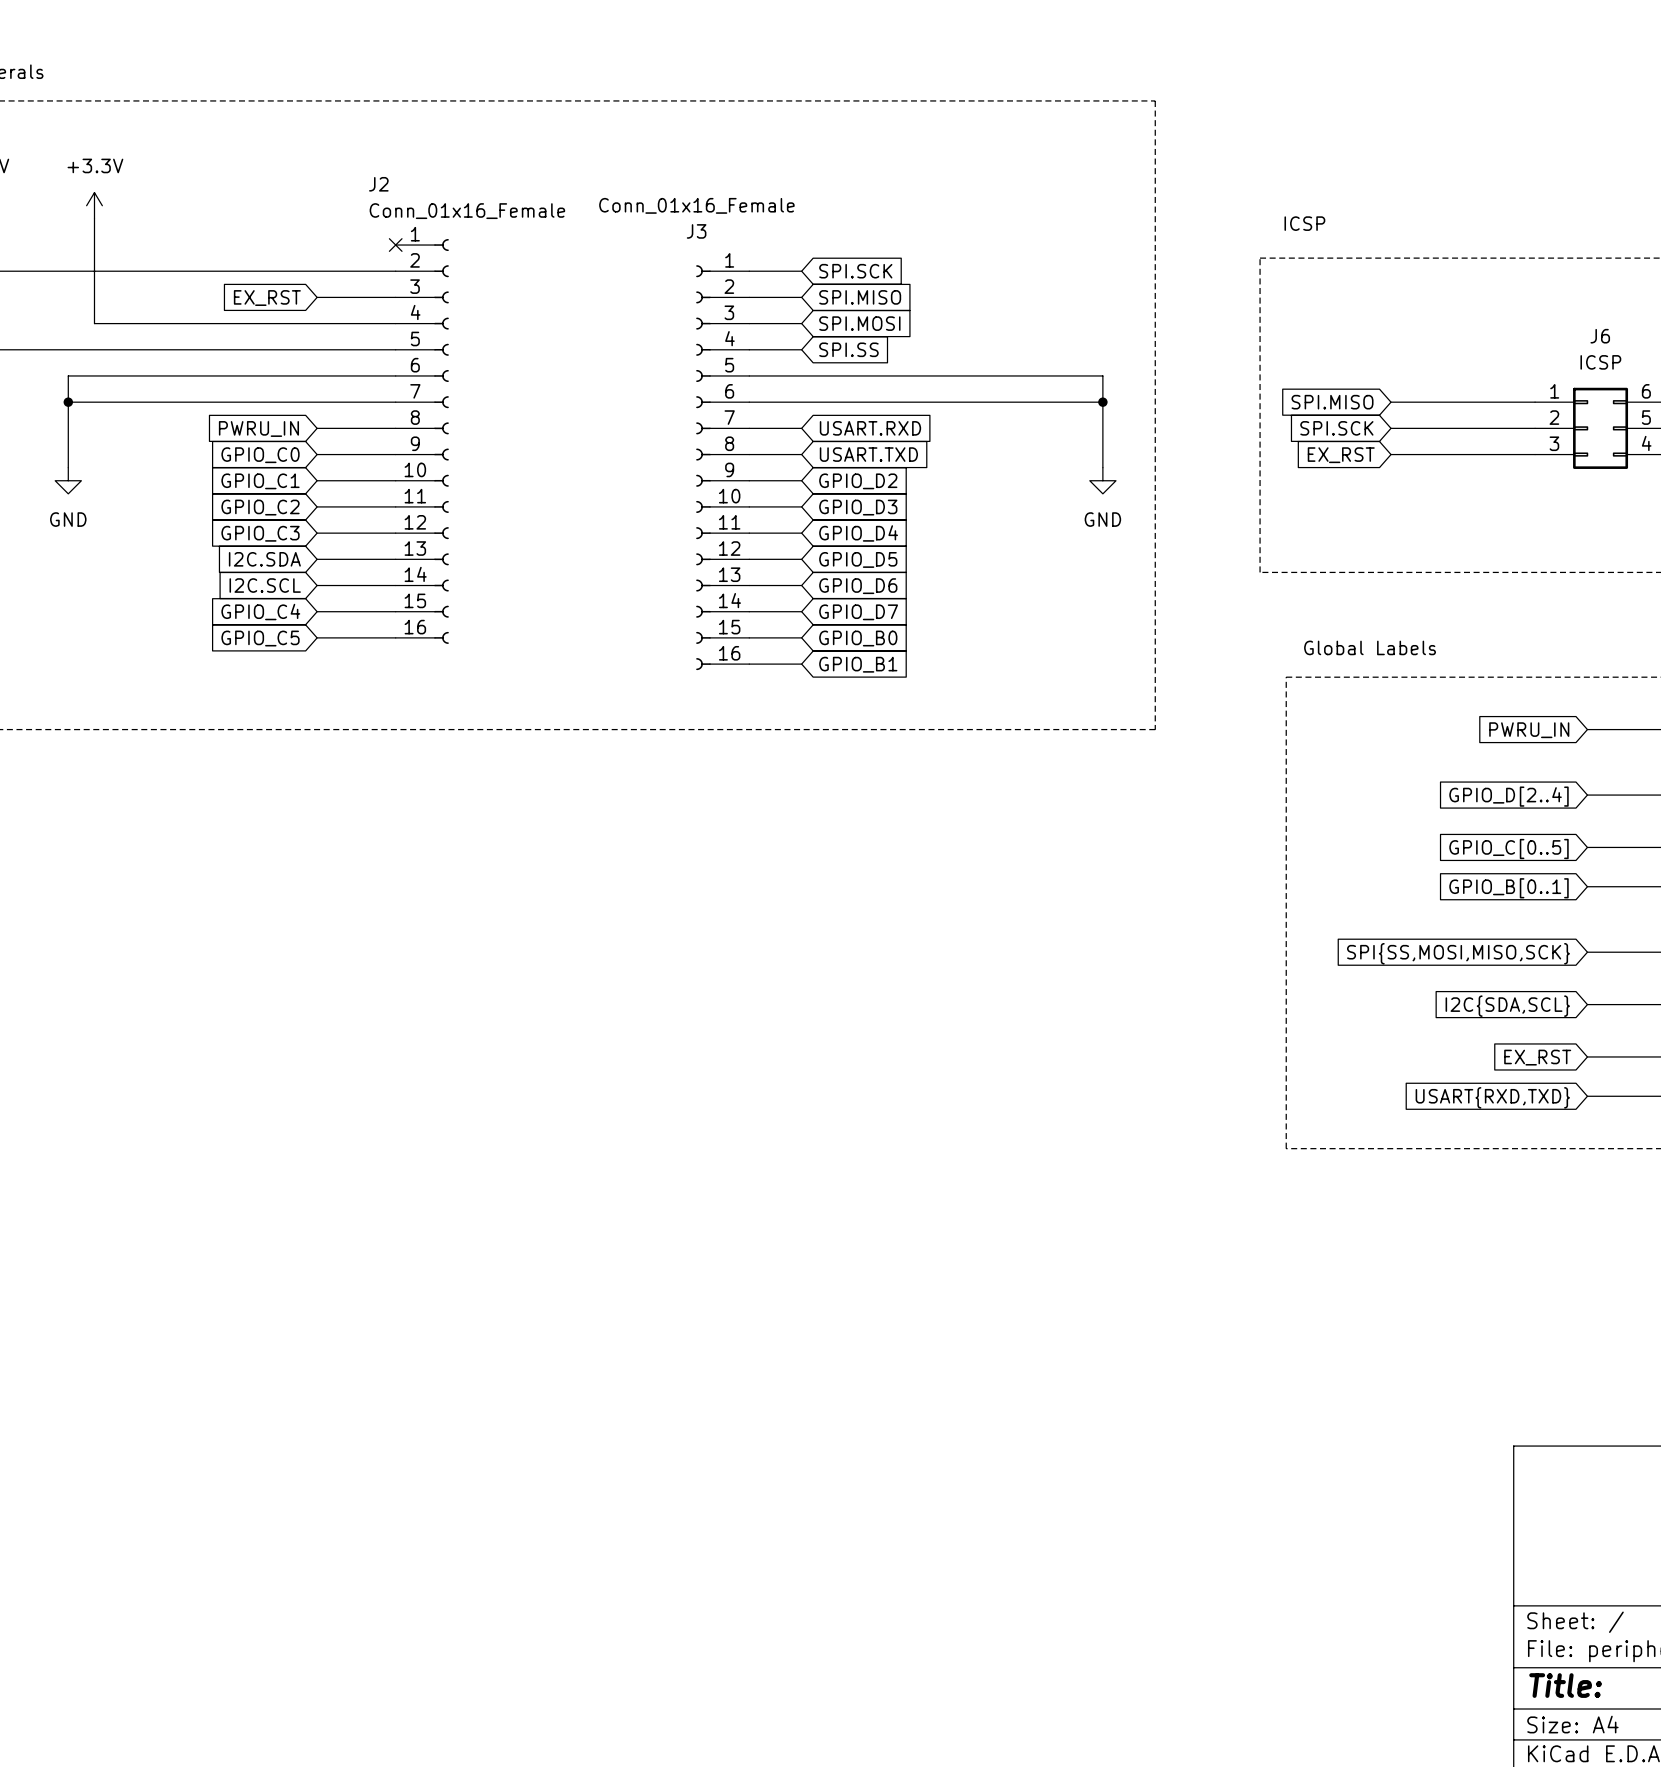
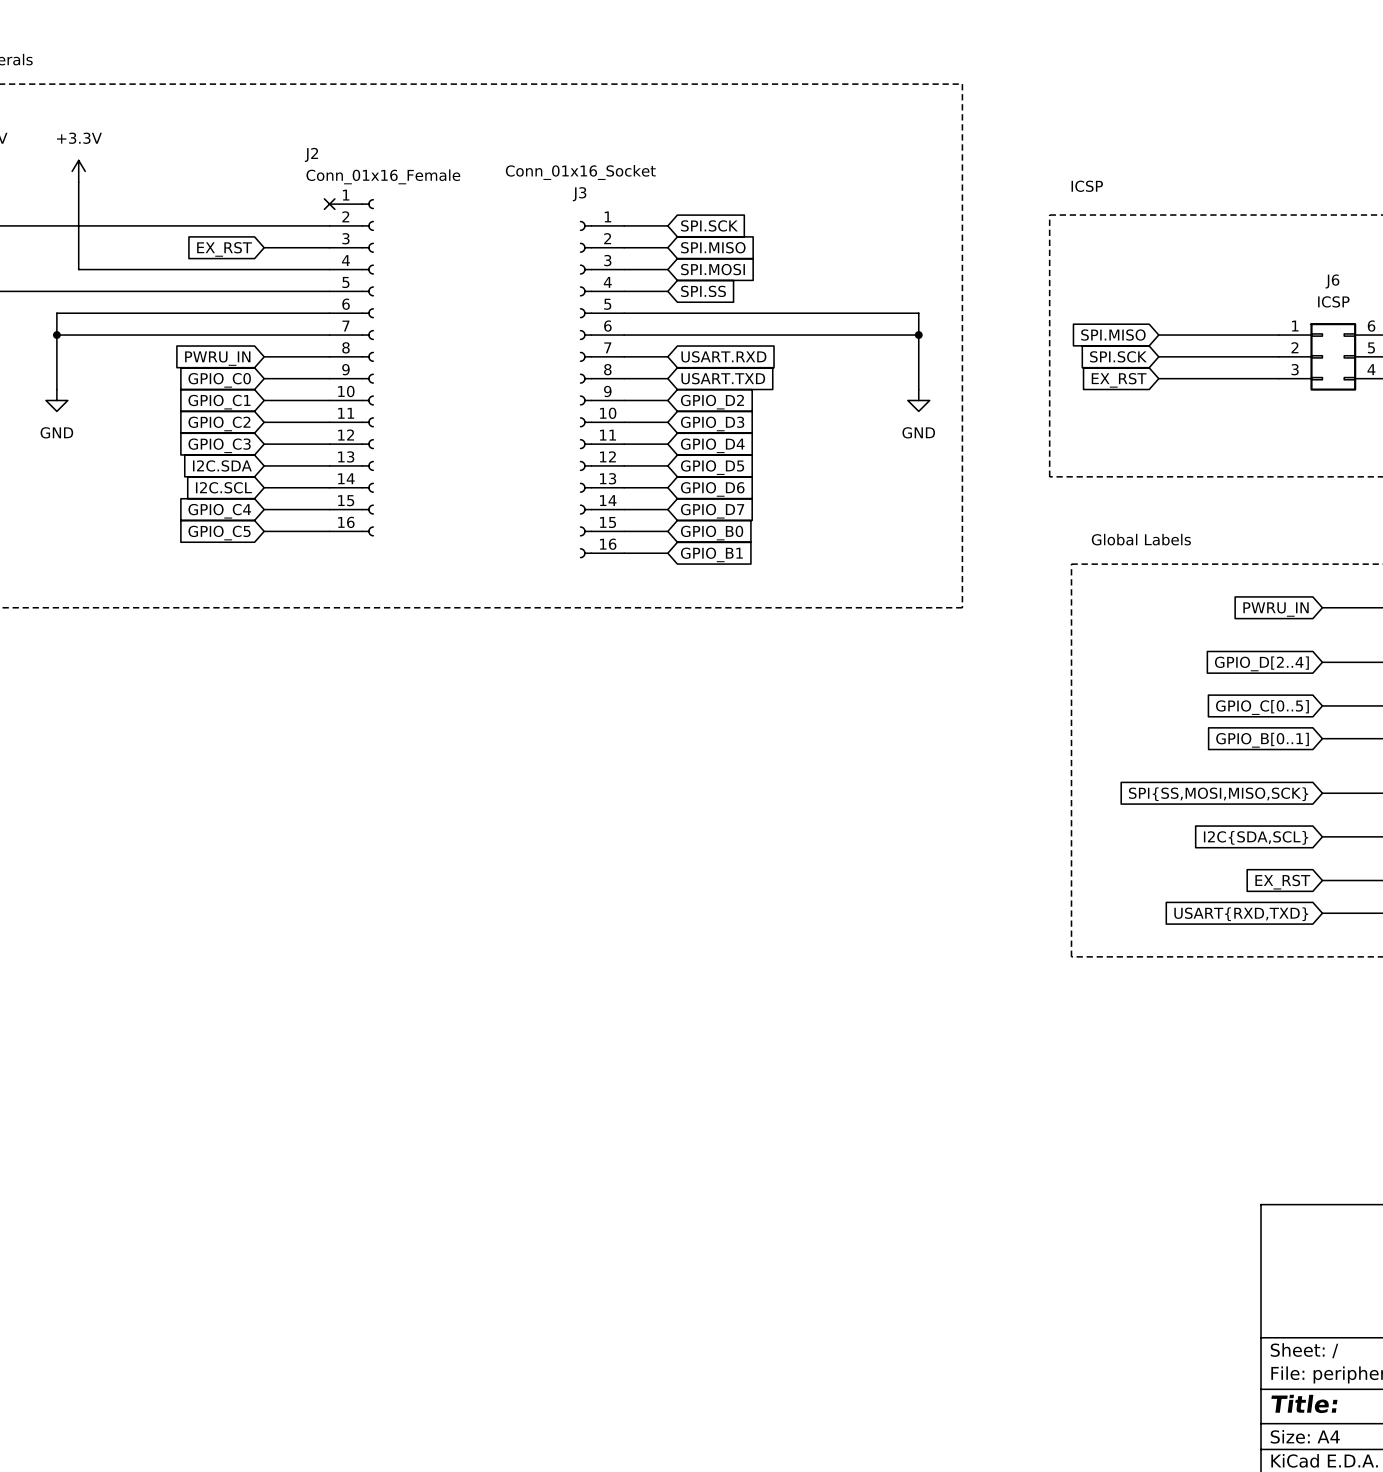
J3 value: Conn_01x16_Female (696, 205) -> Conn_01x16_Socket (580, 172)

